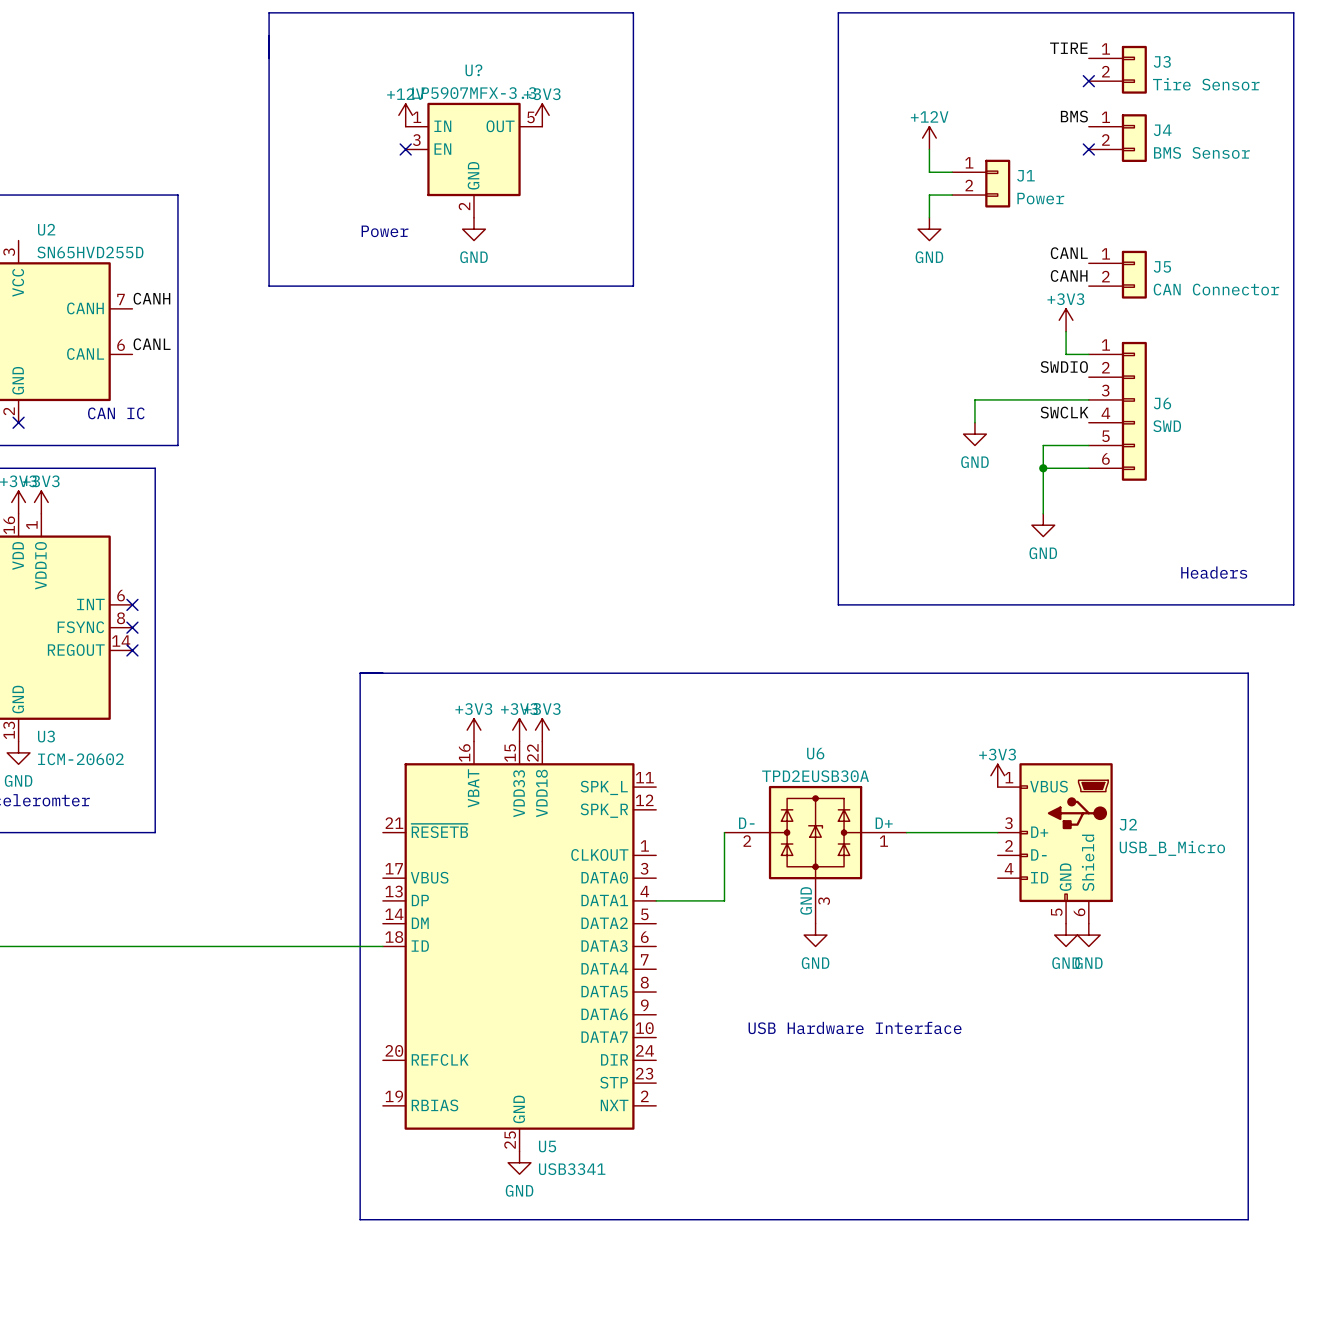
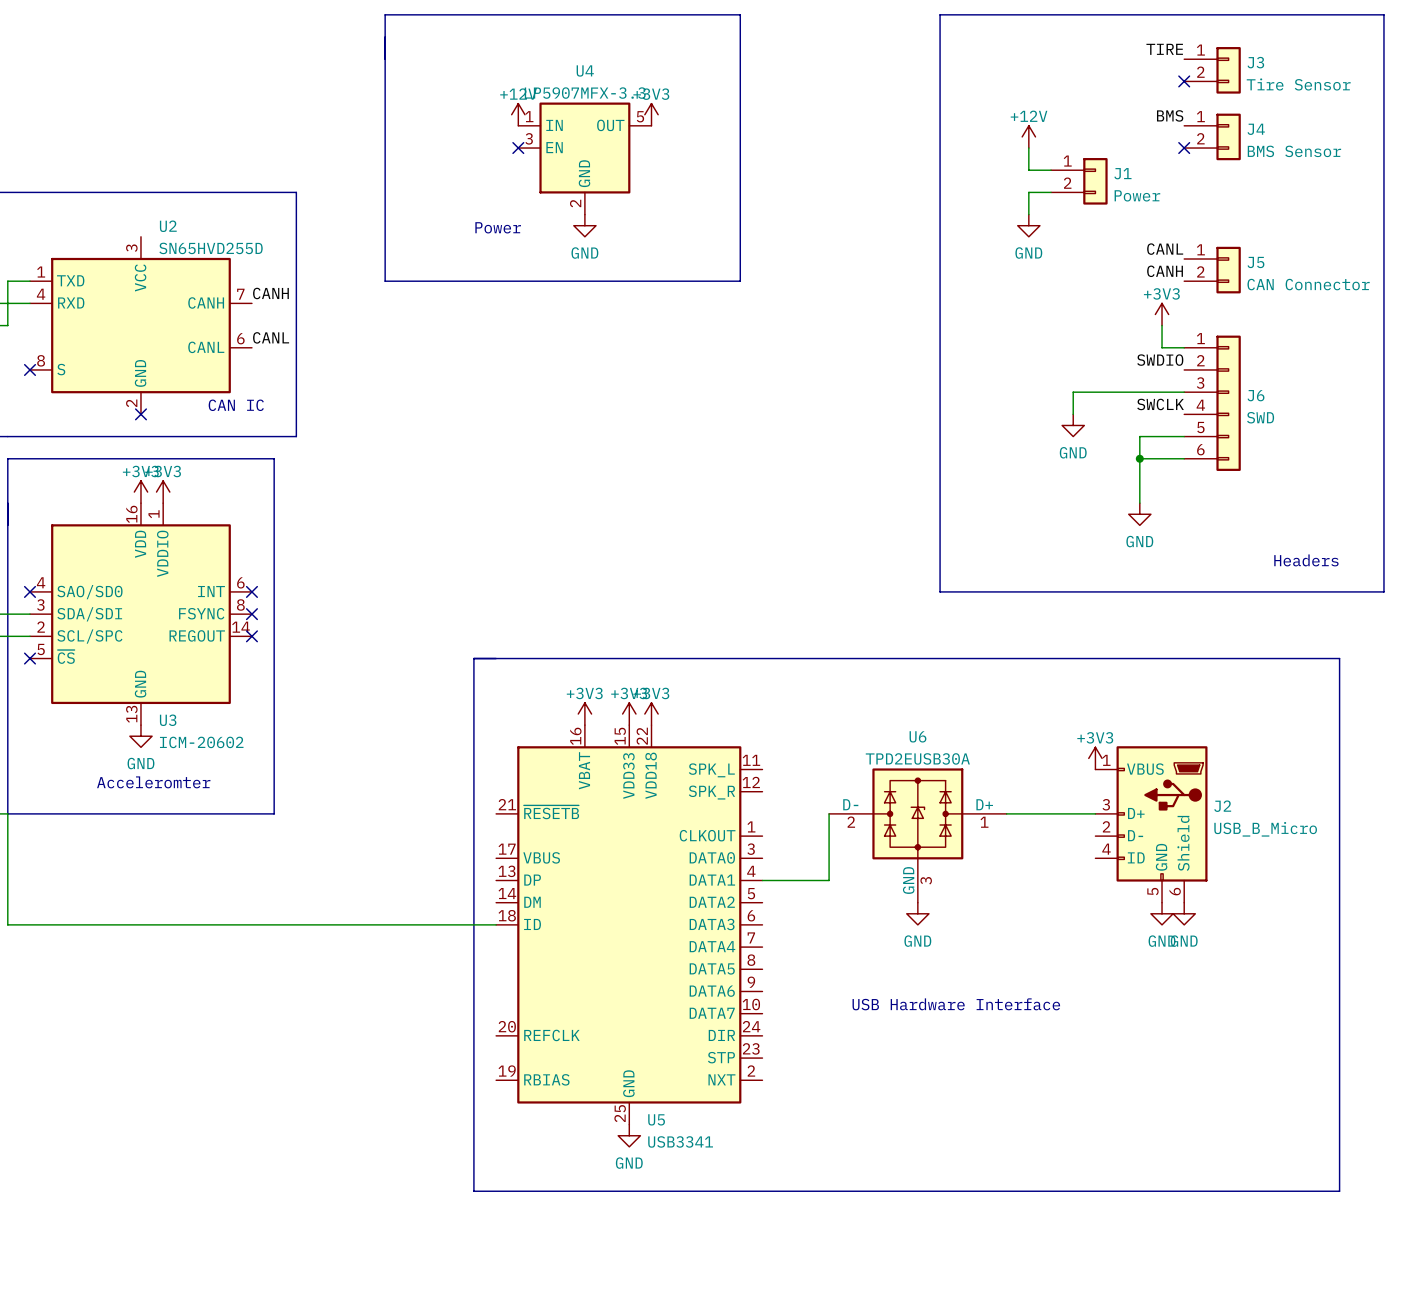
U? name: U? (473, 70) -> U4 (585, 70)

